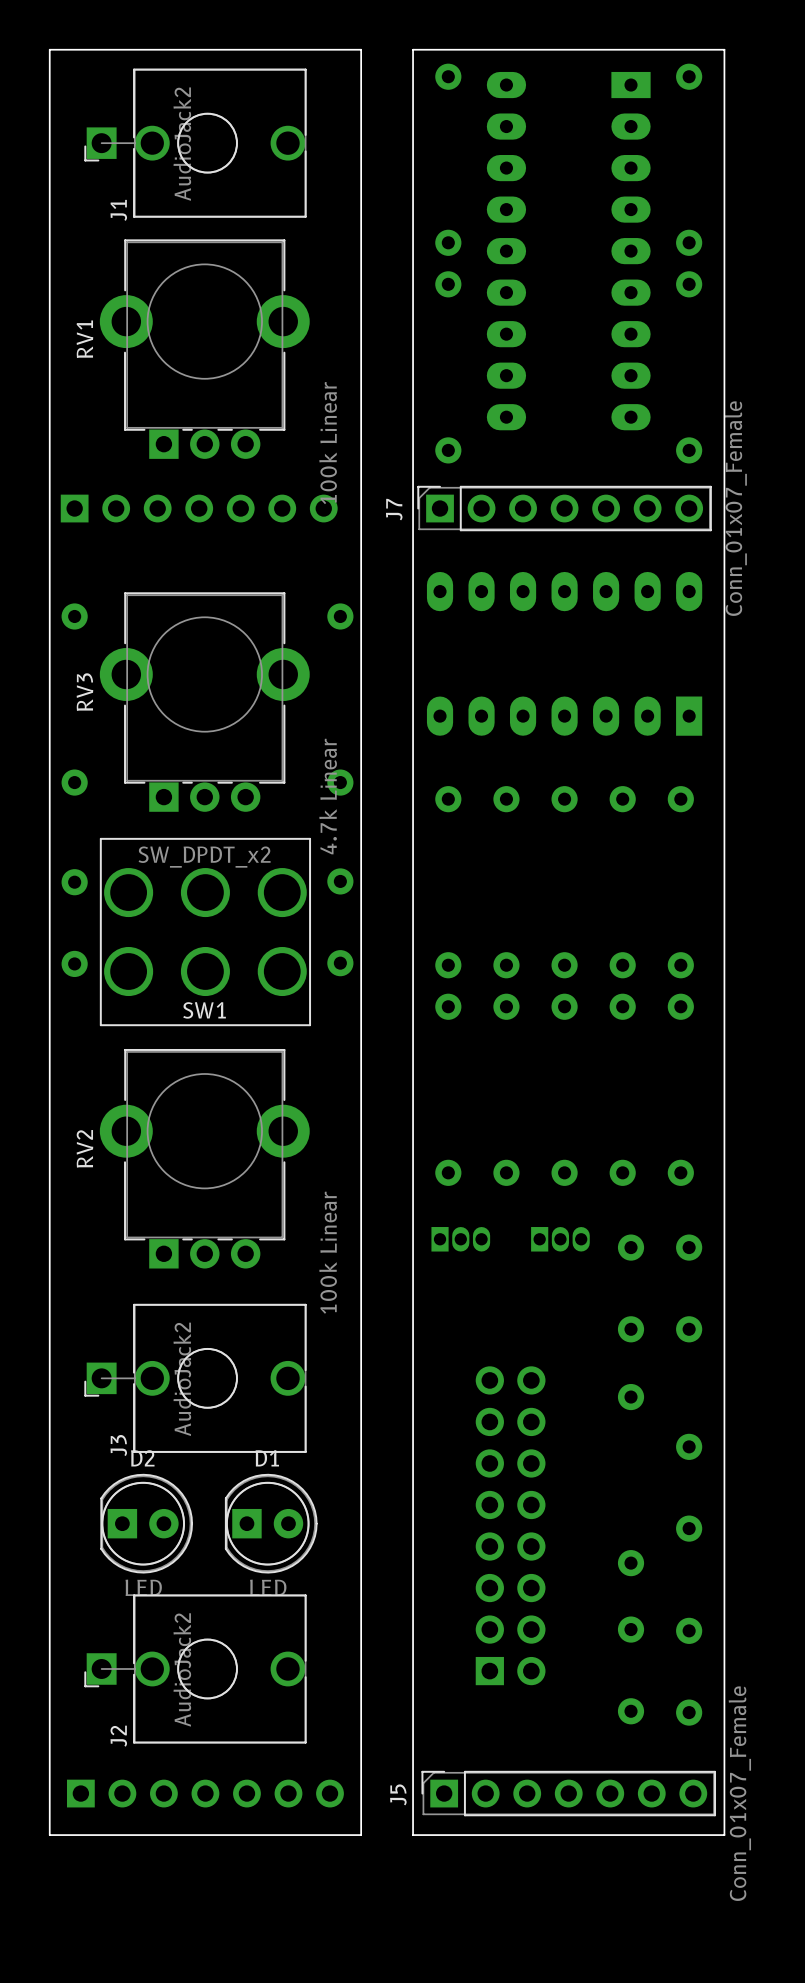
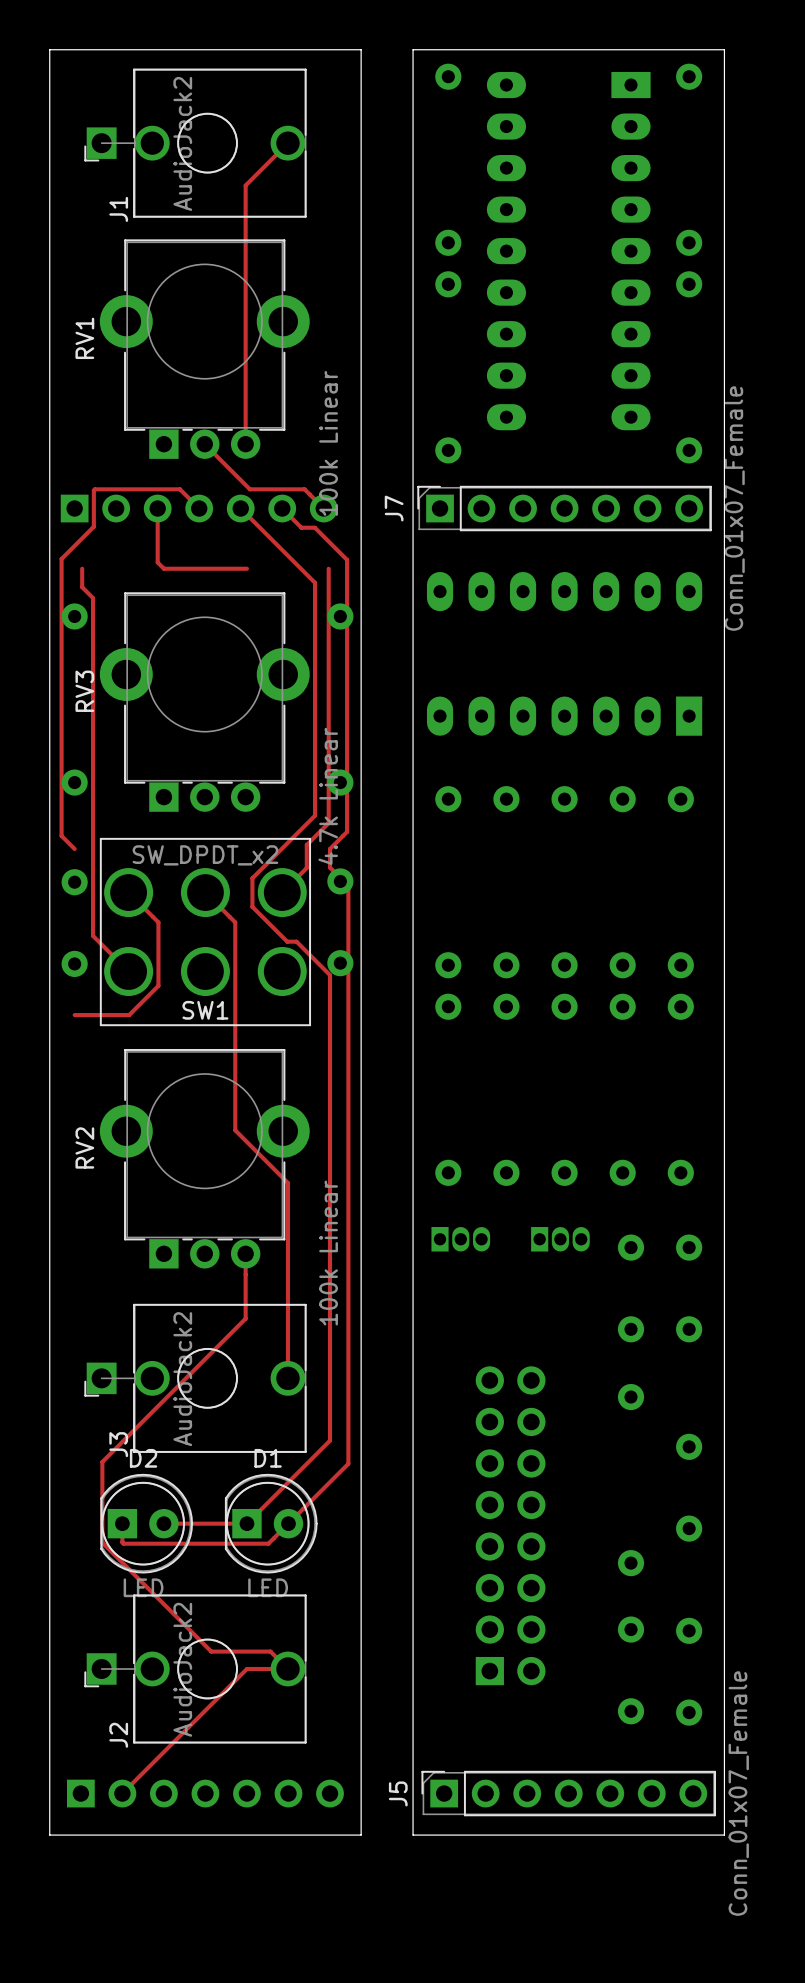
track: none -> (287, 143) (245, 185) (245, 444)
track: none -> (204, 444) (249, 489) (304, 489) (323, 508)
track: none -> (157, 508) (157, 562) (163, 568) (246, 568)
track: none -> (199, 508) (180, 489) (94, 489) (93, 526) (61, 558) (61, 835) (74, 848)
track: none -> (240, 508) (315, 582) (315, 815) (252, 878) (252, 906) (287, 941) (296, 941) (330, 975) (330, 1440) (246, 1523) (163, 1523)
track: none -> (282, 508) (301, 527) (314, 527) (347, 559) (347, 831) (330, 848) (330, 867) (348, 885) (348, 1463) (268, 1543) (123, 1543) (122, 1523)
track: none -> (82, 568) (82, 587) (93, 598) (93, 935) (128, 971)
track: none -> (328, 568) (328, 823) (306, 844) (306, 868) (282, 892)
track: none -> (128, 892) (158, 922) (158, 985) (129, 1015) (74, 1015)
track: none -> (205, 892) (235, 922) (235, 1130) (287, 1183) (287, 1378)
track: none -> (245, 1253) (245, 1318) (102, 1461) (102, 1542) (211, 1651) (270, 1651) (287, 1668) (246, 1668) (122, 1793)

